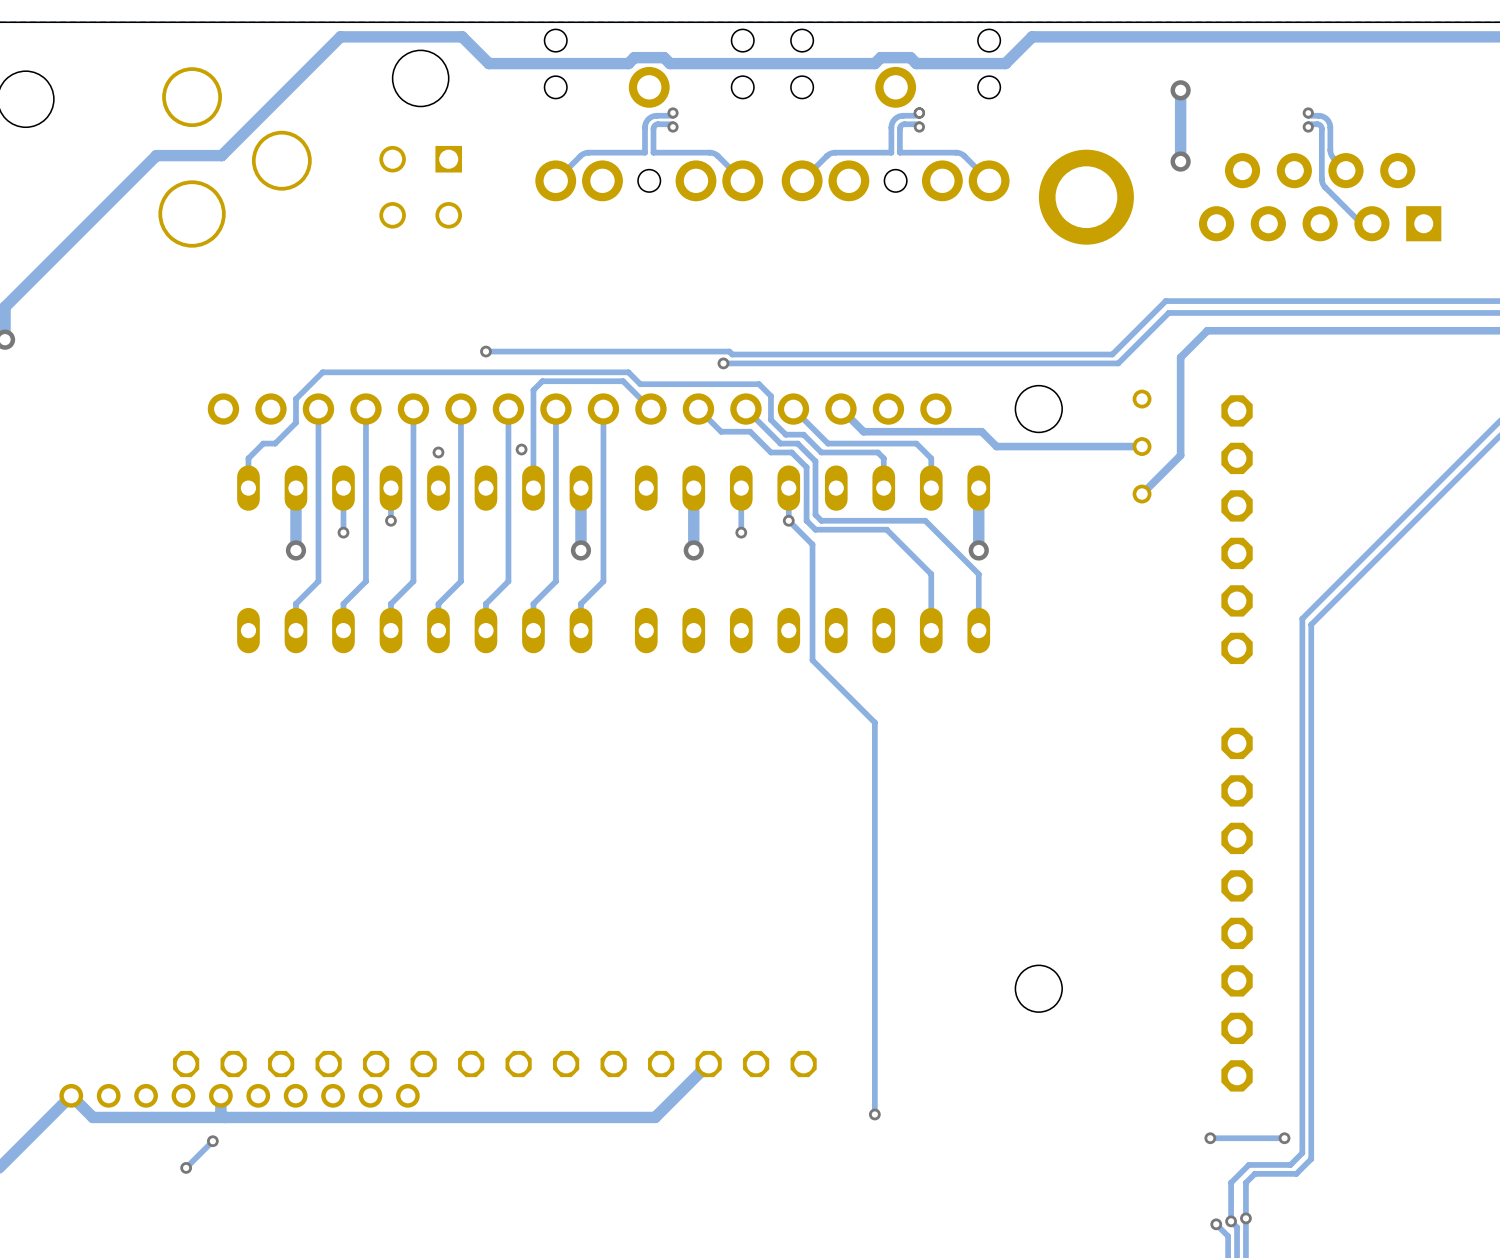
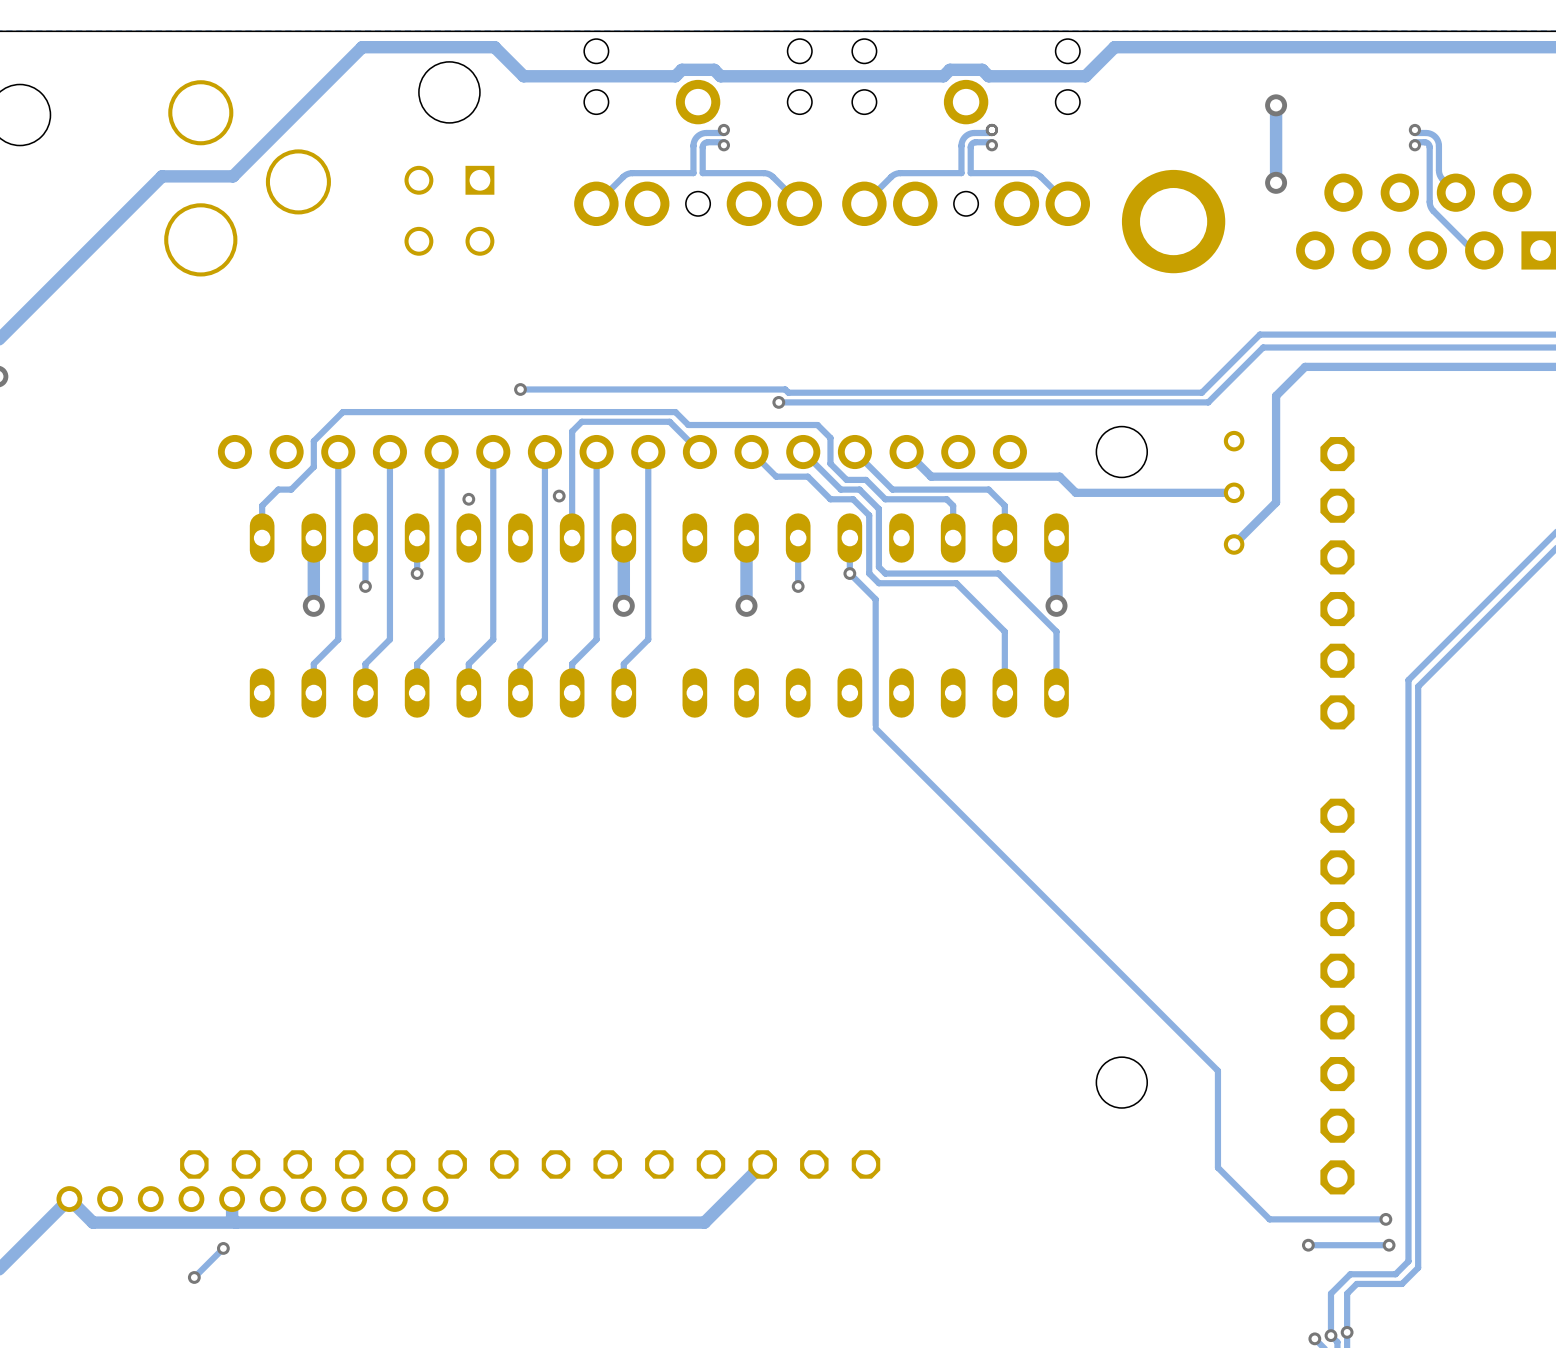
track: (812, 660) (874, 722) (874, 1114) -> (875, 725) (875, 728) (1217, 1070) (1217, 1167) (1269, 1219) (1385, 1219)
via: (874, 1114) -> none
via: none -> (1385, 1219)

